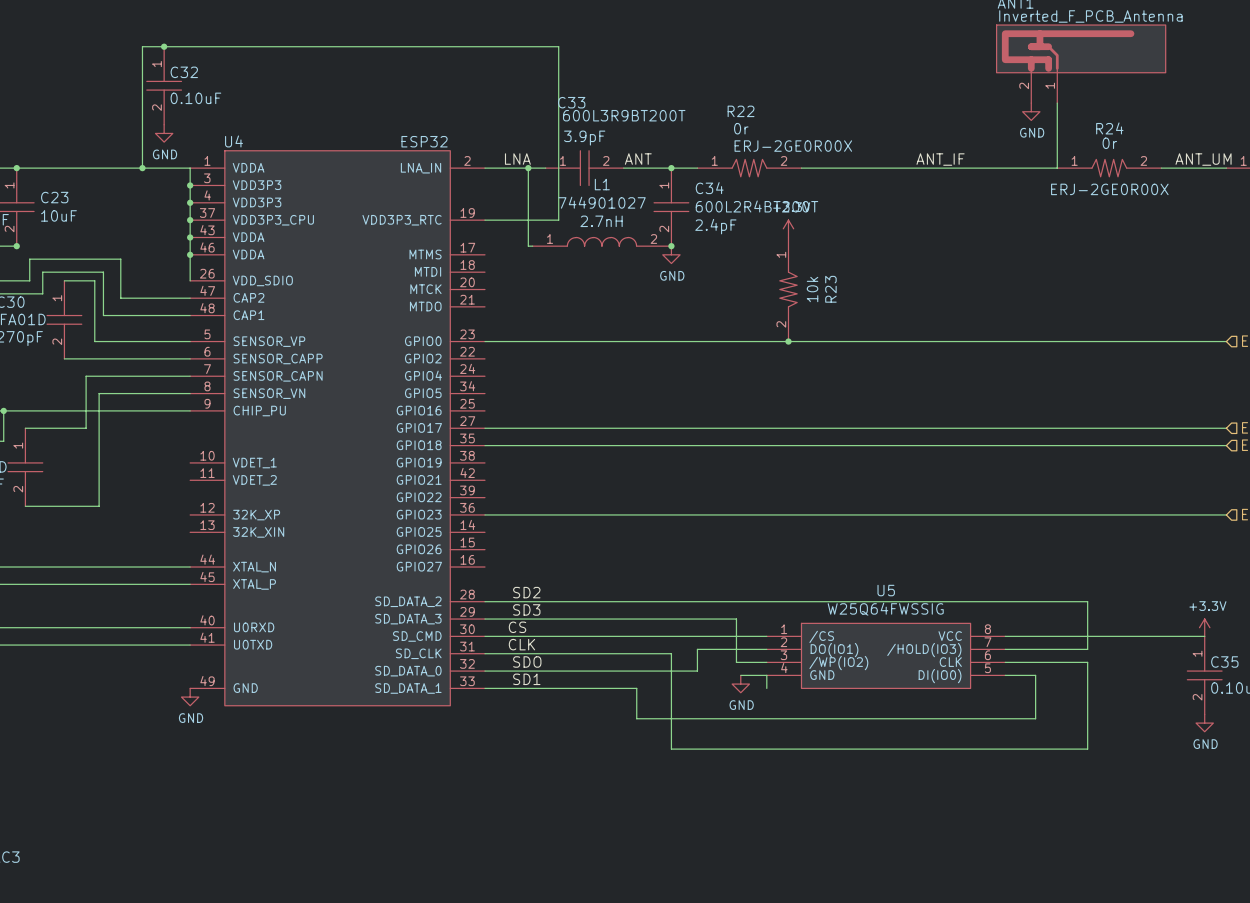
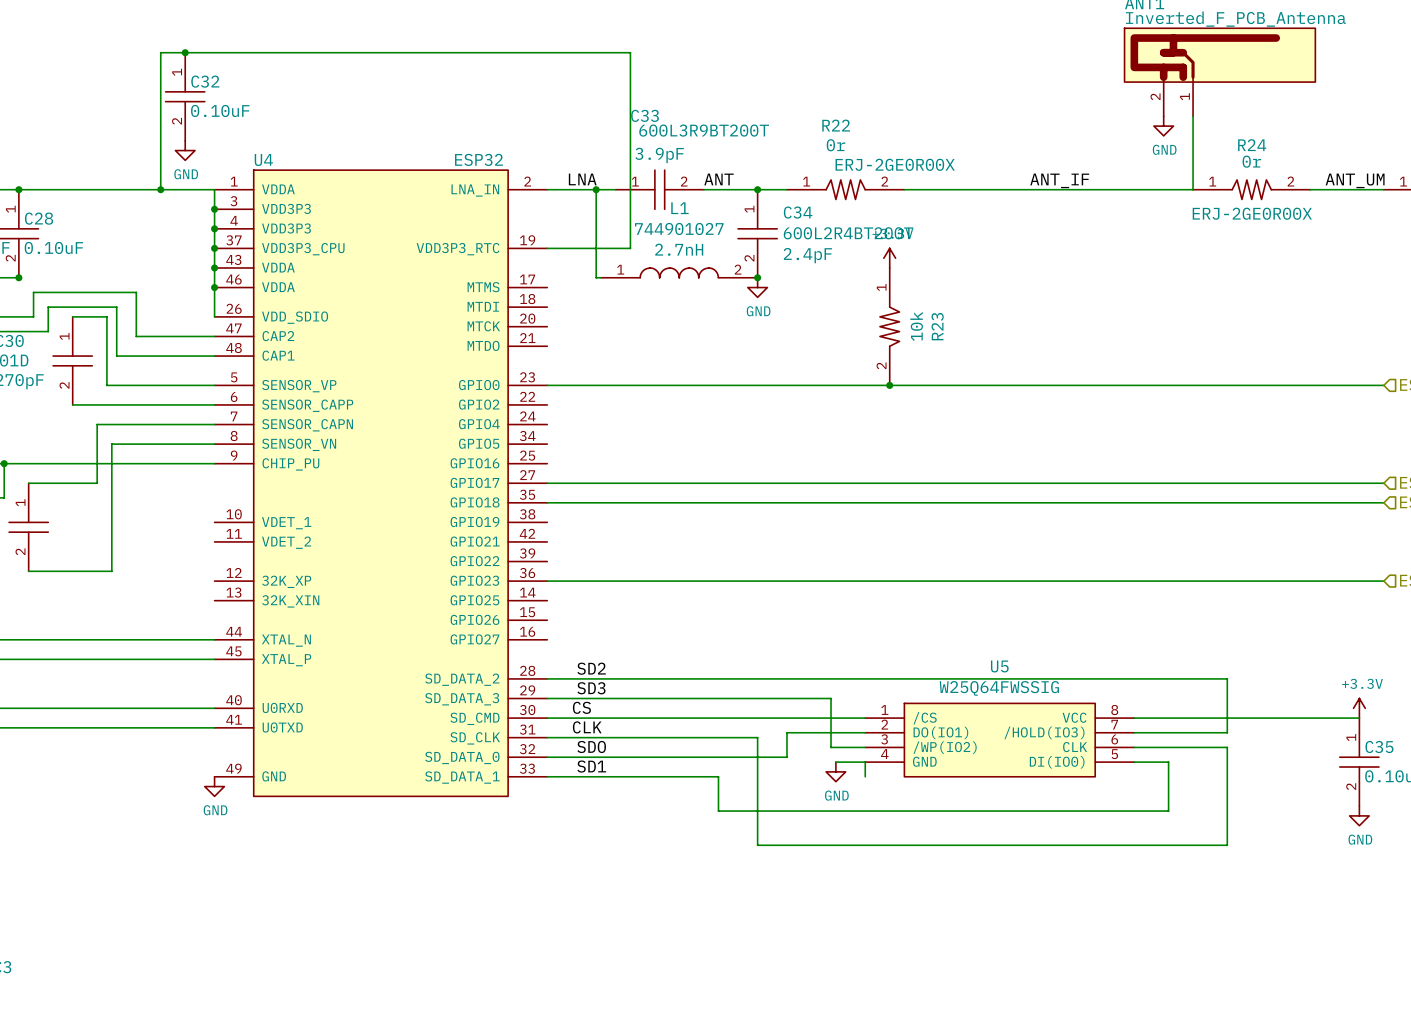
C23 name: C23 (54, 197) -> C28 (39, 218)
C23 text: 10uF (58, 215) -> none
C23 text: none -> 0.10uF (53, 247)

